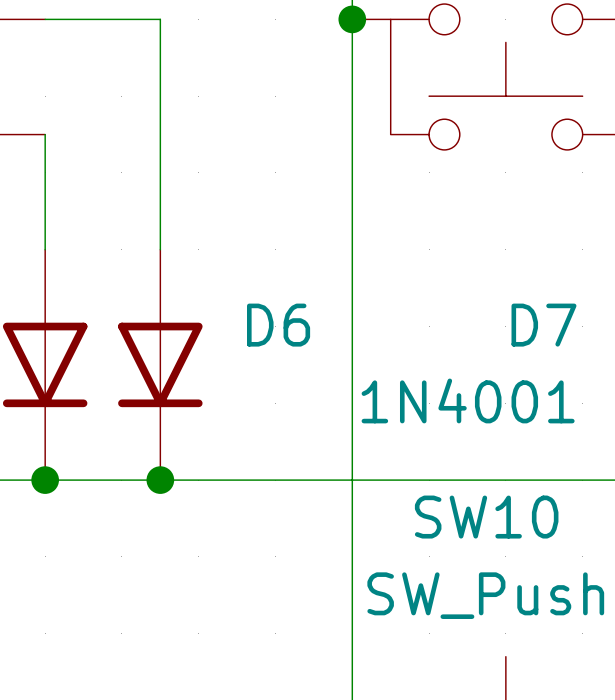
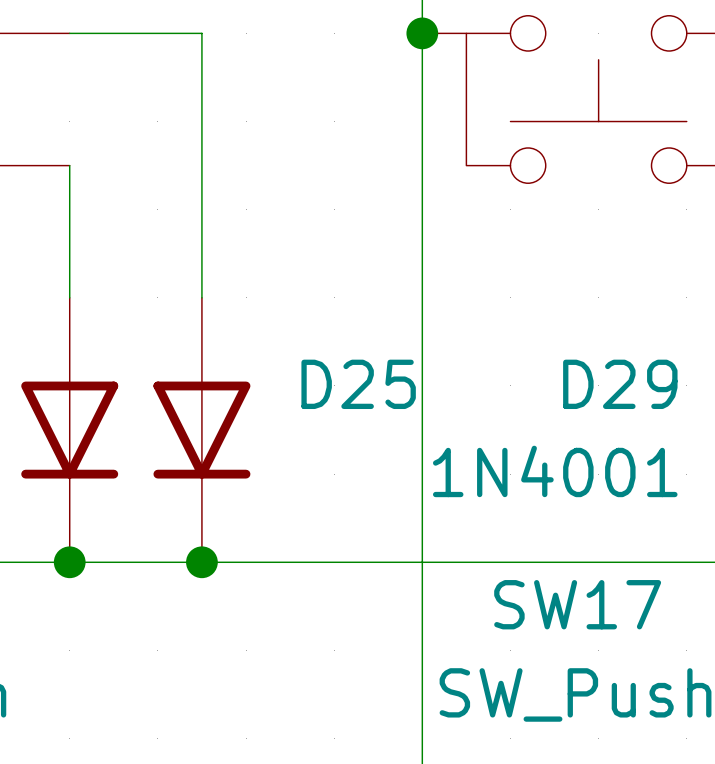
D6 name: D6 (278, 325) -> D25 (358, 384)
D7 name: D7 (543, 325) -> D29 (620, 384)
SW10 name: SW10 (486, 517) -> SW17 (577, 604)

